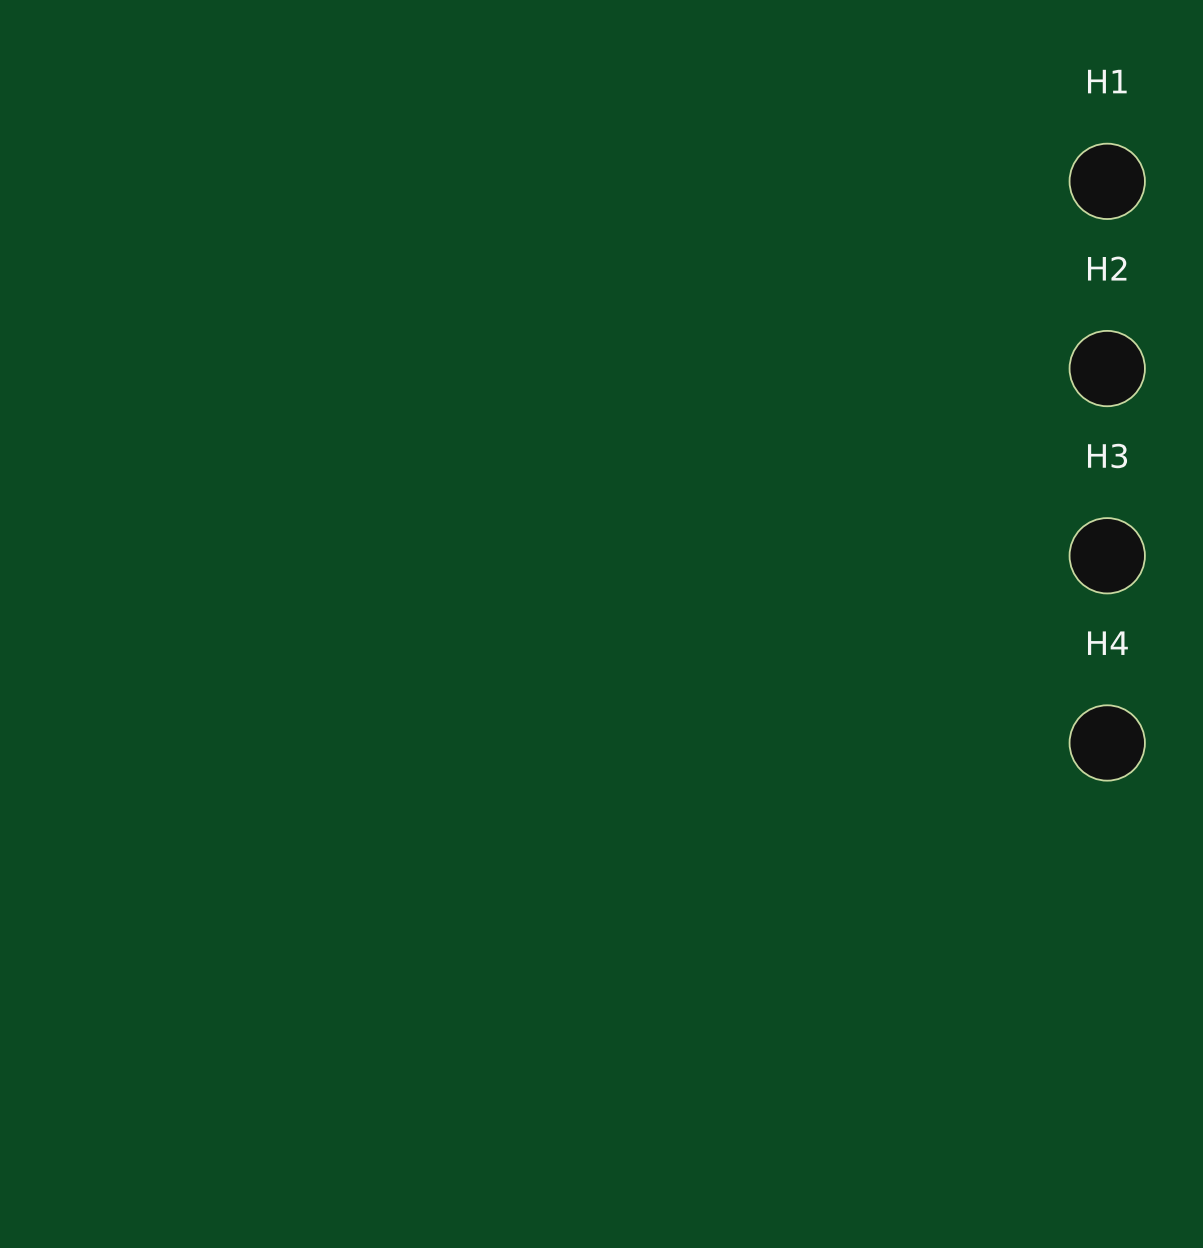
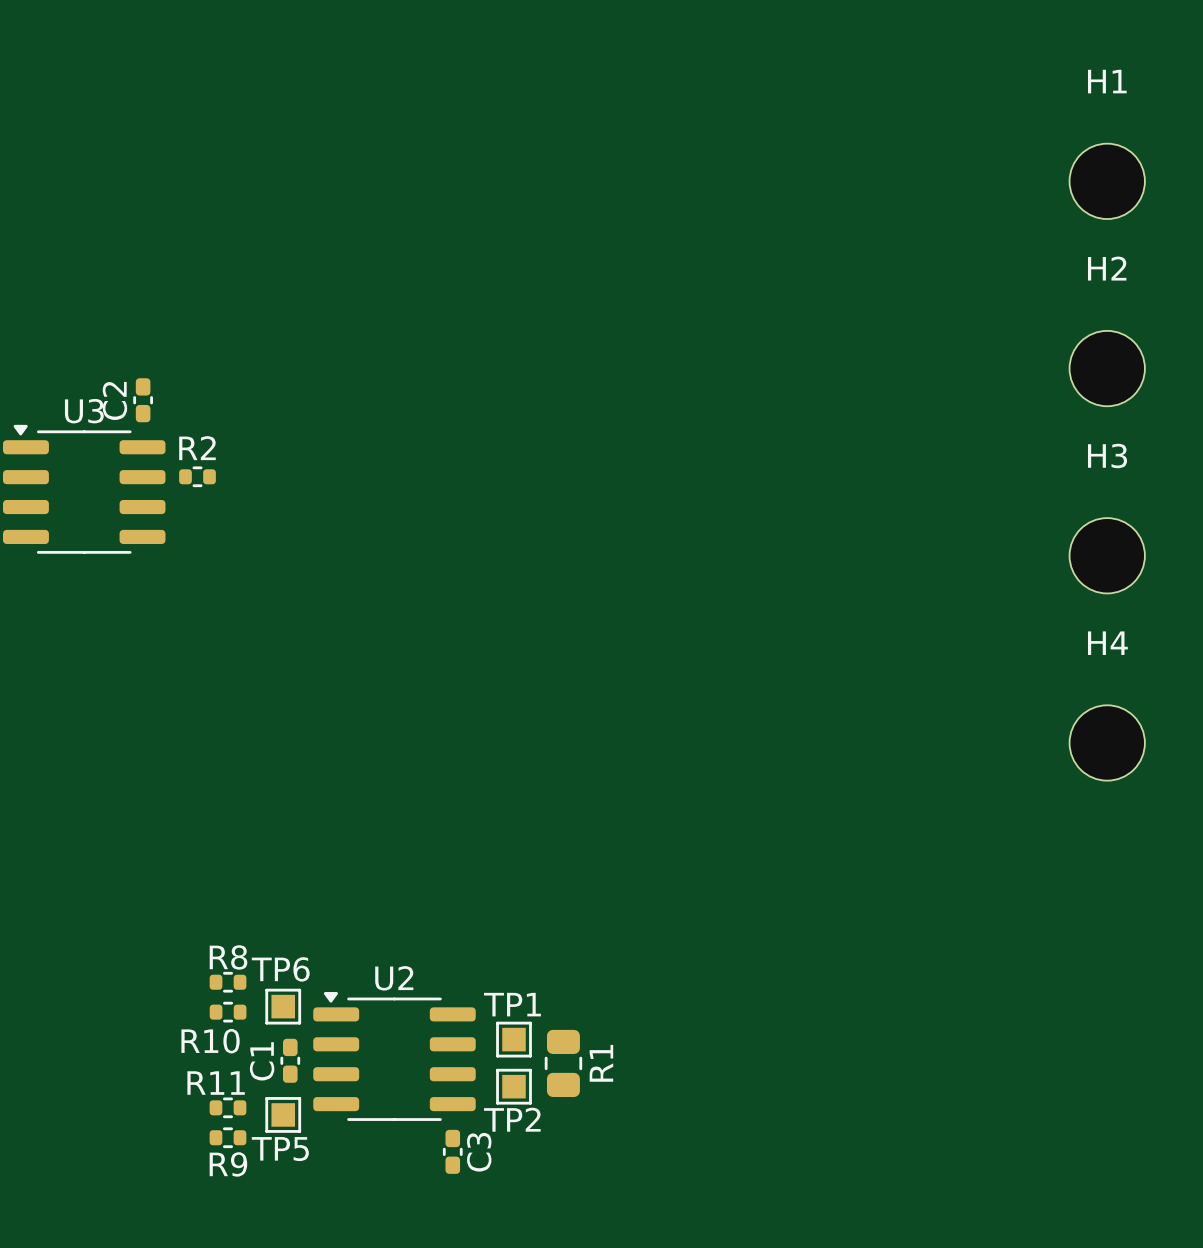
C2: none -> (143, 400)
R2: none -> (197, 476)
U3: none -> (84, 489)
R8: none -> (228, 982)
TP6: none -> (283, 1006)
R10: none -> (228, 1012)
TP1: none -> (514, 1039)
U2: none -> (394, 1056)
C1: none -> (290, 1060)
R1: none -> (563, 1063)
TP2: none -> (514, 1086)
R11: none -> (227, 1107)
TP5: none -> (283, 1114)
R9: none -> (227, 1137)
C3: none -> (452, 1151)

